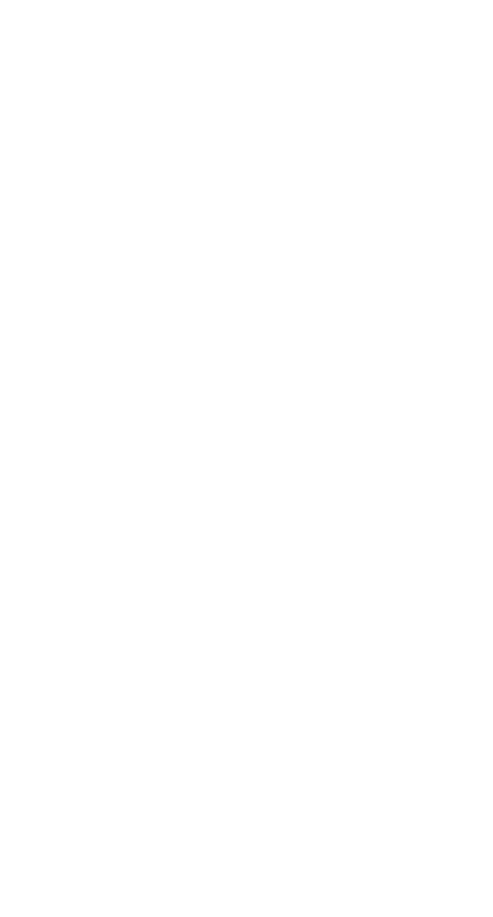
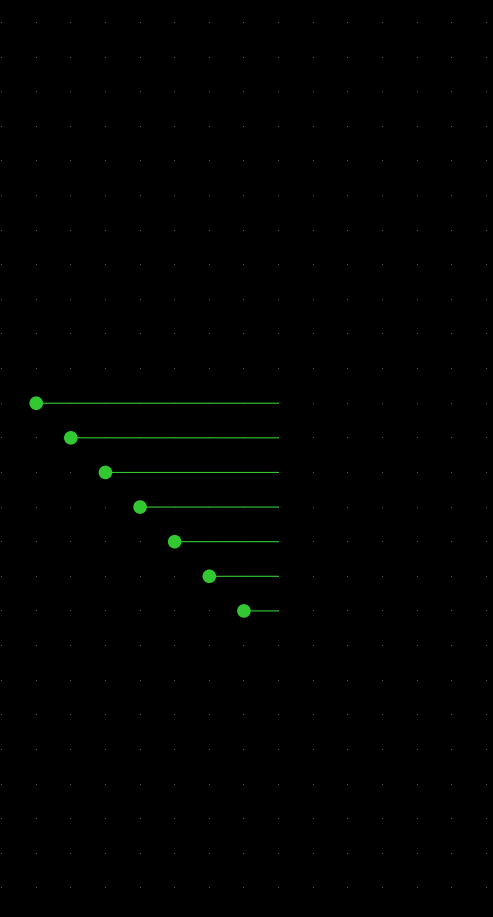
wire: none -> (36, 403) (278, 403)
junction: none -> (36, 403)
wire: none -> (70, 437) (278, 437)
junction: none -> (70, 437)
wire: none -> (105, 472) (278, 472)
junction: none -> (105, 472)
wire: none -> (140, 507) (278, 507)
junction: none -> (140, 507)
wire: none -> (174, 541) (278, 541)
junction: none -> (174, 541)
wire: none -> (209, 576) (278, 576)
junction: none -> (209, 576)
wire: none -> (243, 610) (278, 610)
junction: none -> (243, 610)

